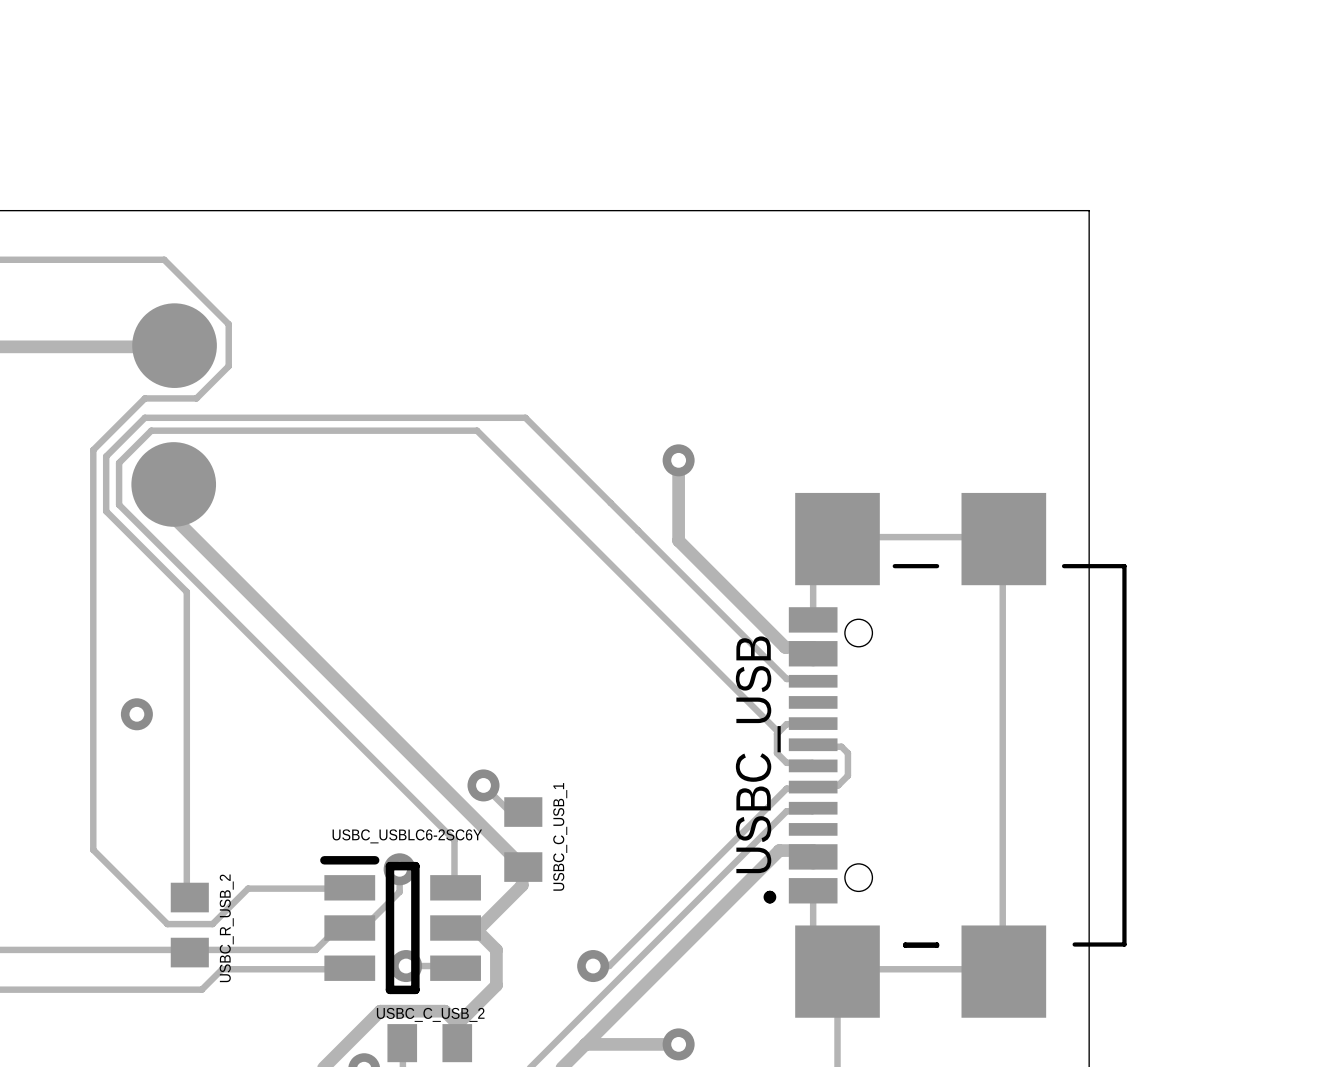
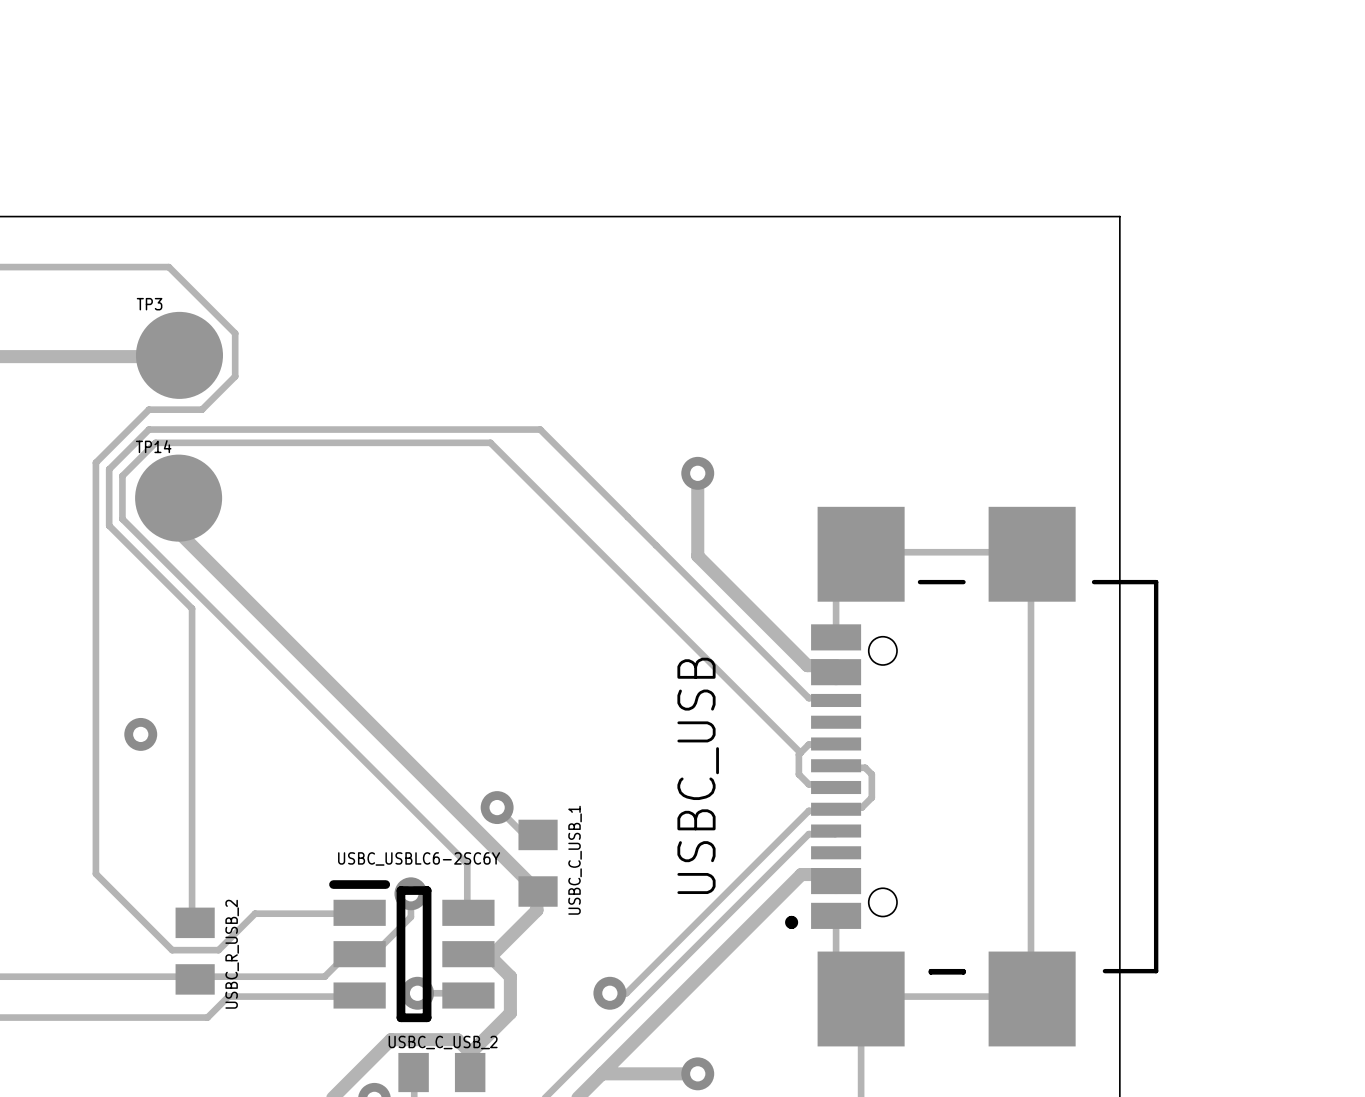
TP3 name: none -> TP3 (149, 304)
TP14 name: none -> TP14 (153, 446)
USBC_USB name position: USBC_USB (758, 754) -> USBC_USB (698, 775)

